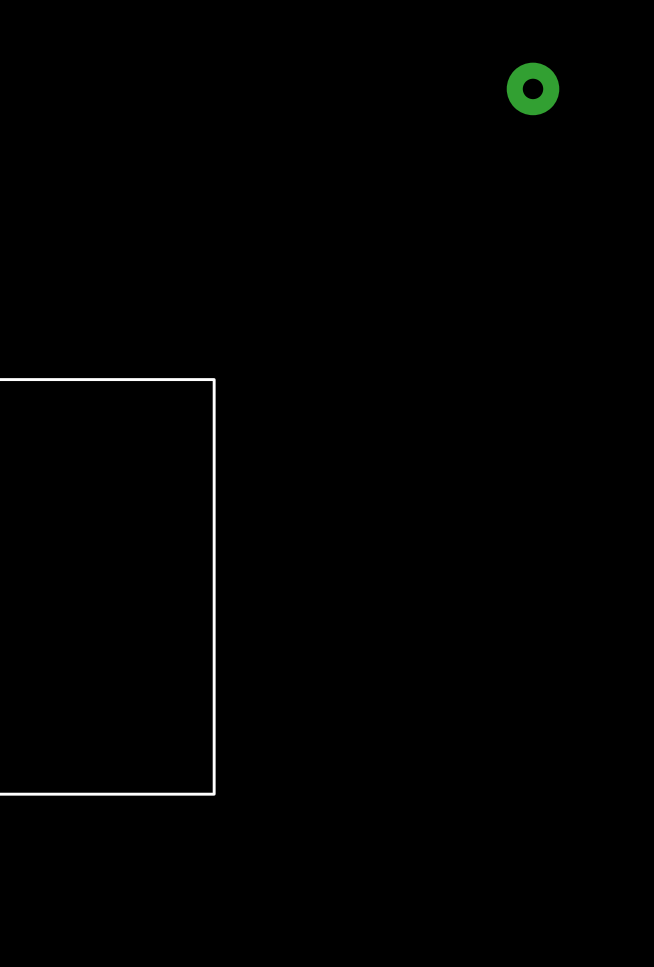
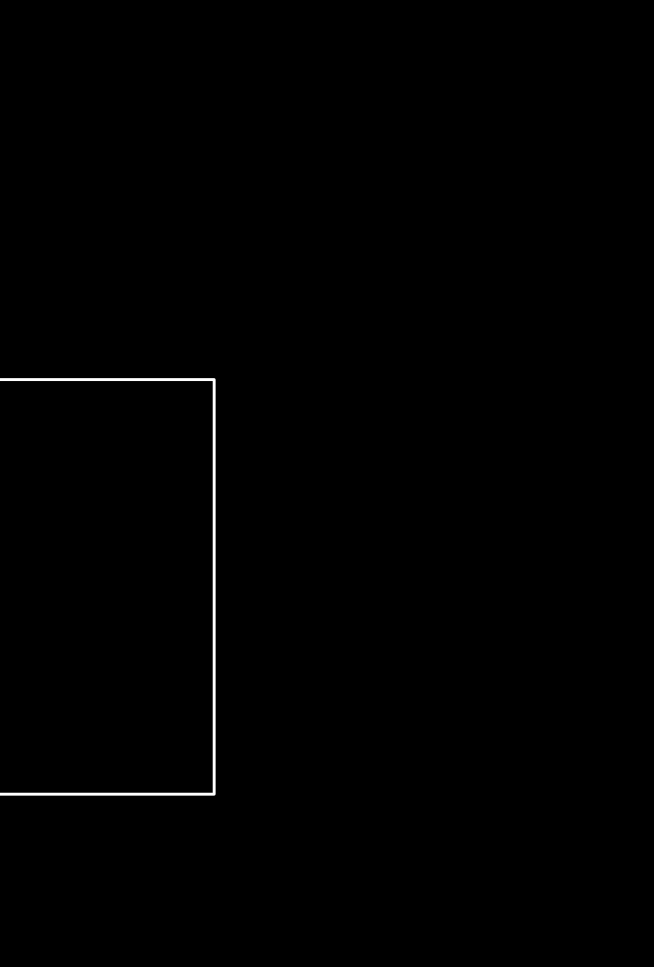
part: (533, 88) -> none

